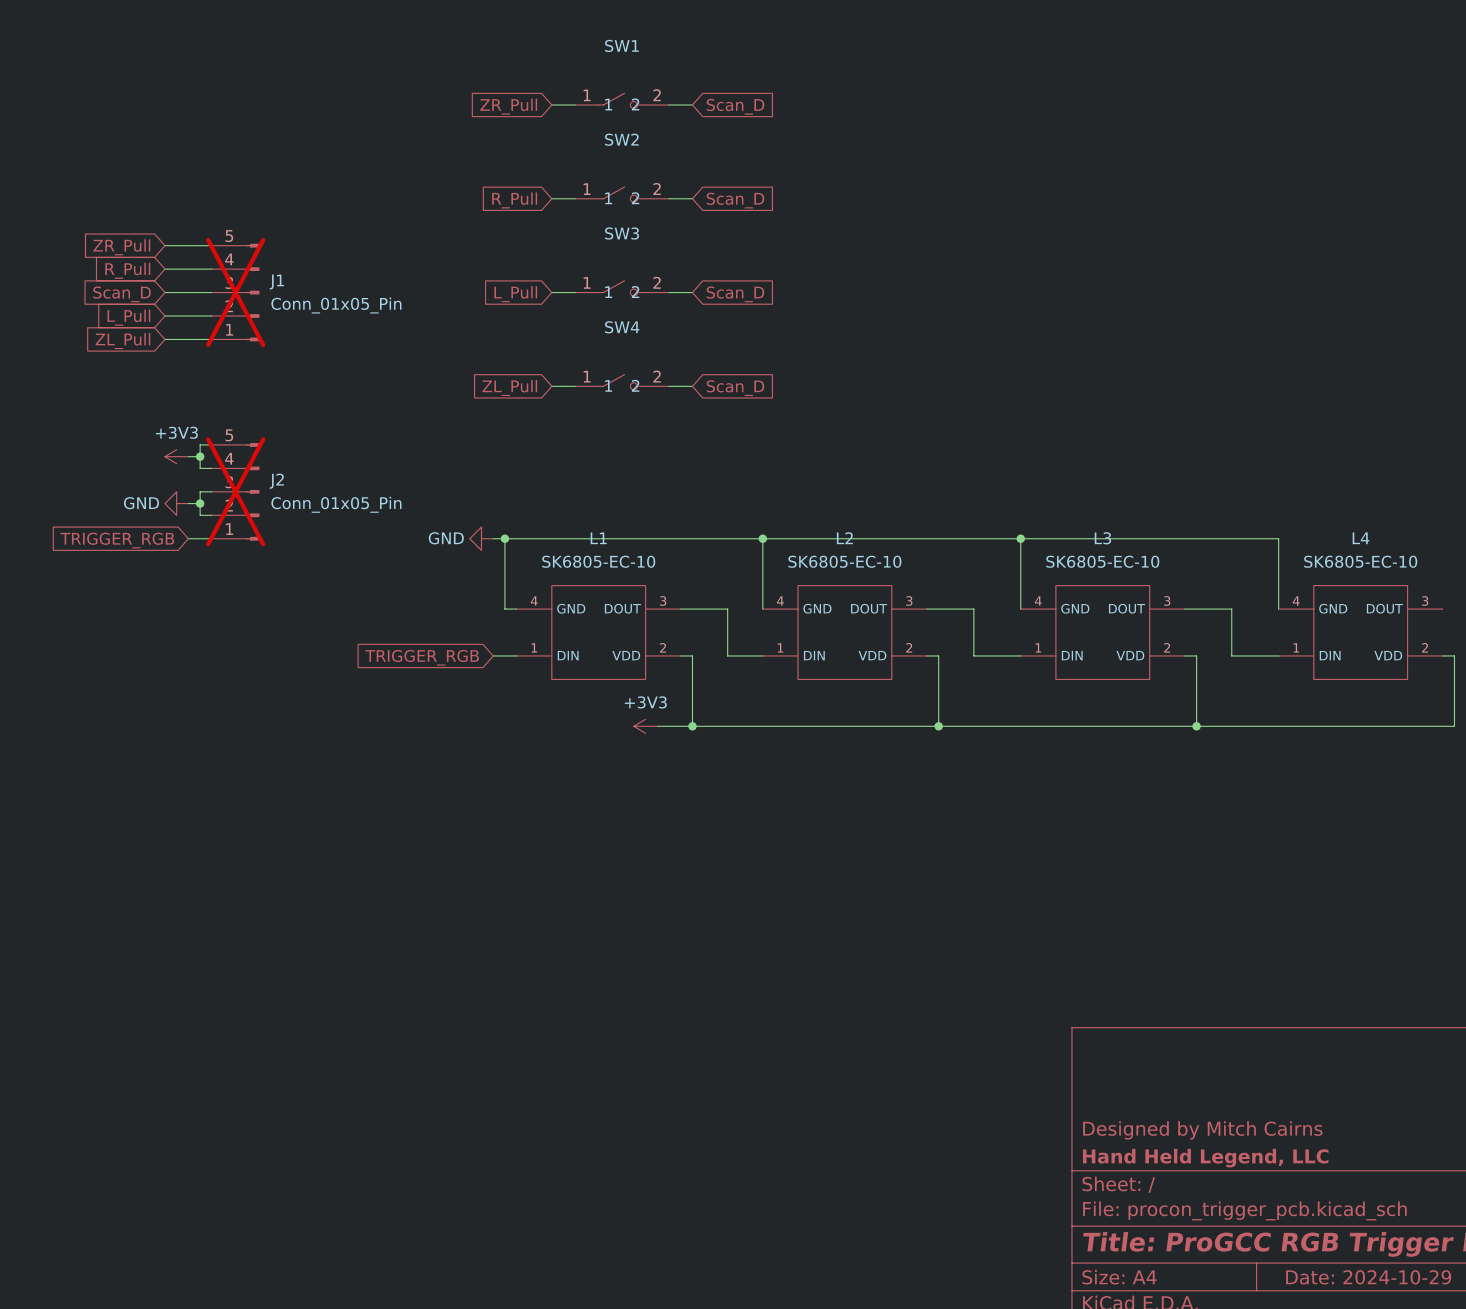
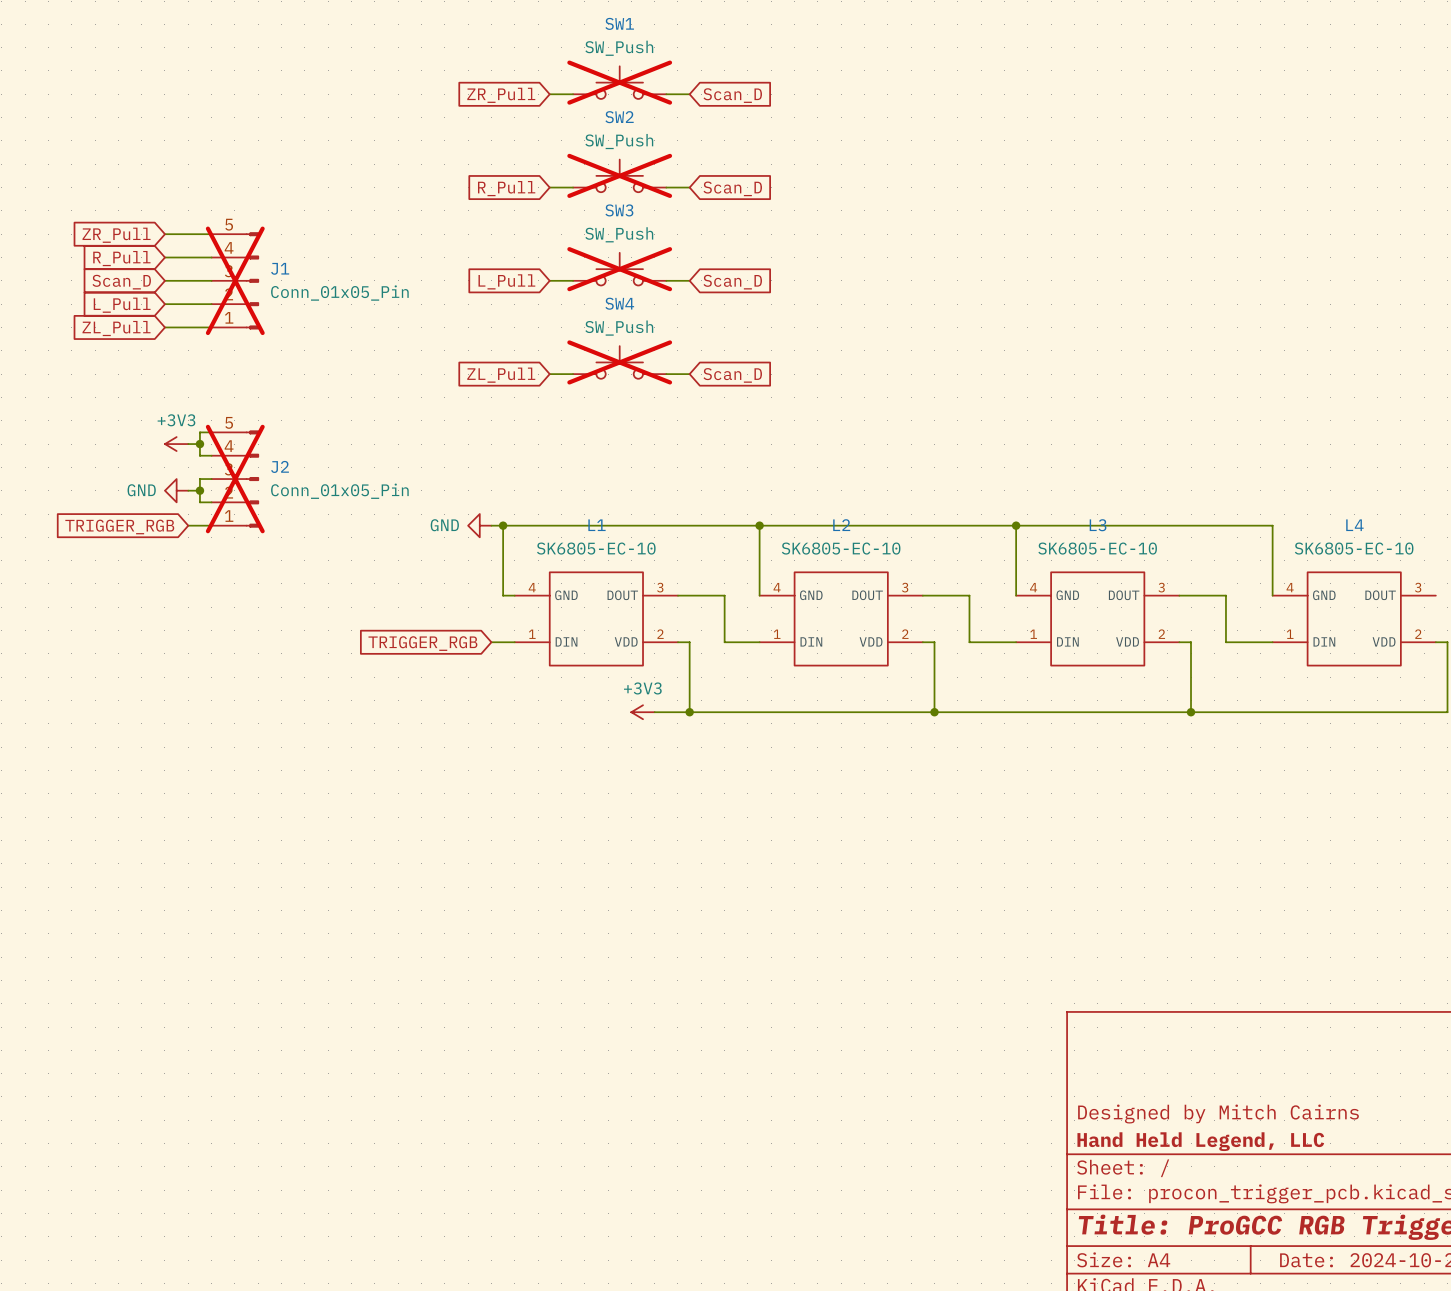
SW1 value: none -> SW_Push (619, 48)
SW1 symbol: [575, 93, 670, 109] -> [573, 66, 667, 99]
SW1 do-not-place cross: none -> (619, 82)
SW2 value: none -> SW_Push (619, 141)
SW2 symbol: [575, 187, 670, 203] -> [573, 159, 667, 193]
SW2 do-not-place cross: none -> (619, 175)
SW3 value: none -> SW_Push (619, 234)
SW3 symbol: [575, 280, 670, 297] -> [573, 252, 667, 286]
SW3 do-not-place cross: none -> (619, 269)
SW4 value: none -> SW_Push (619, 328)
SW4 symbol: [575, 374, 670, 390] -> [573, 346, 667, 379]
SW4 do-not-place cross: none -> (619, 362)

